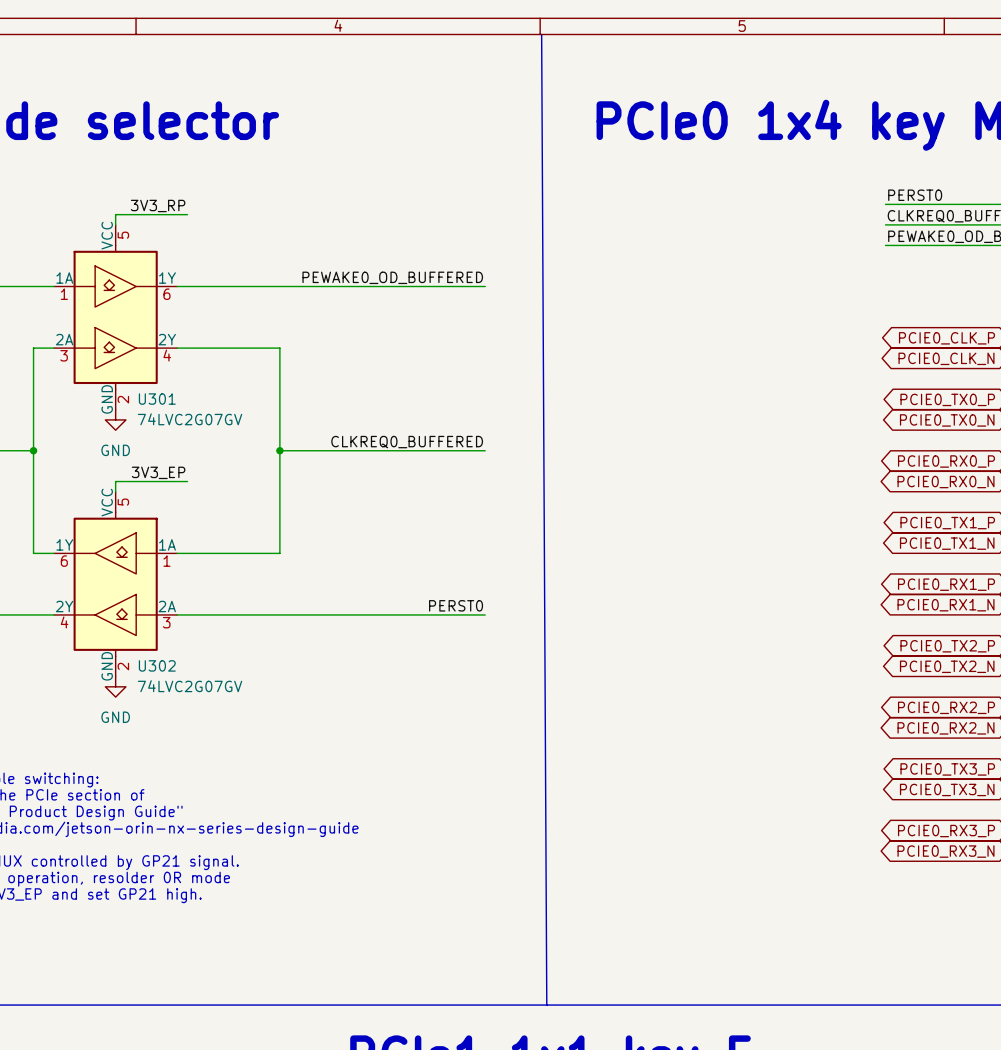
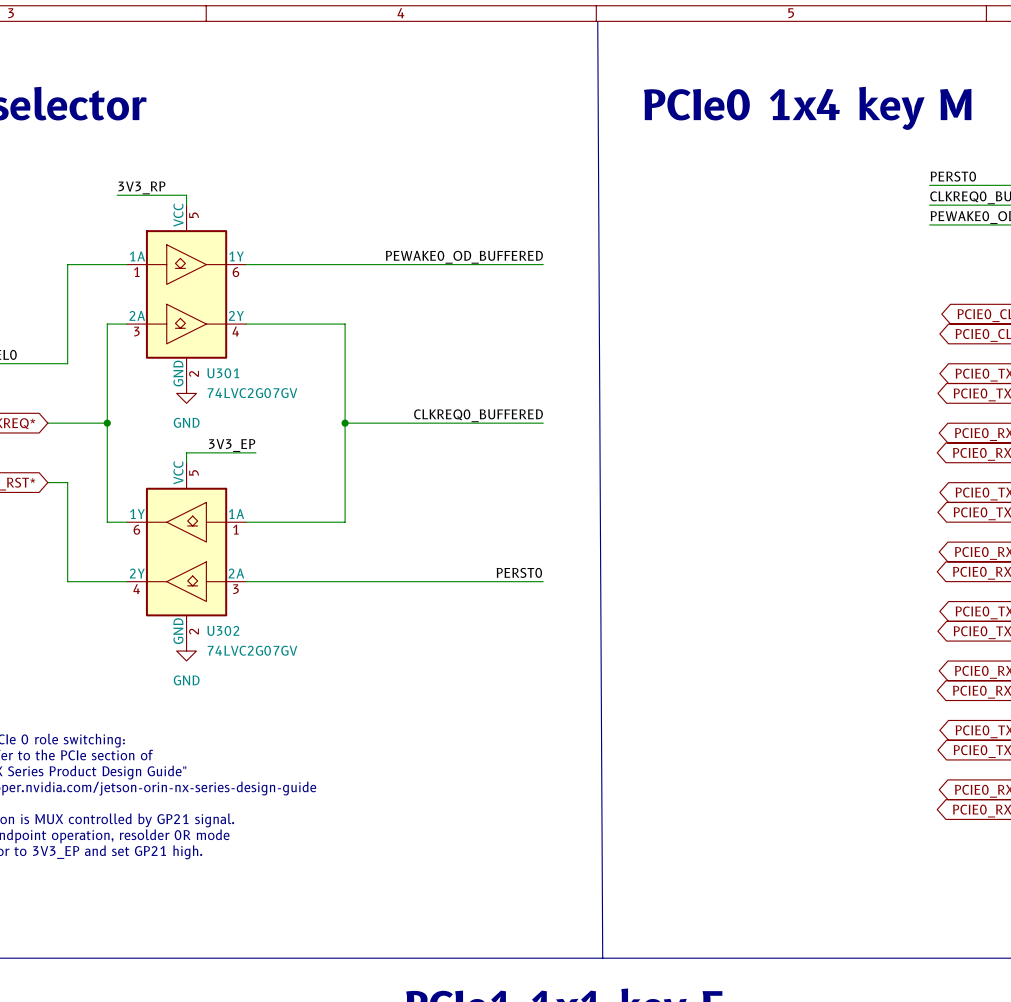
label position: 3V3_RP (158, 205) -> 3V3_RP (141, 187)
wire: (115, 214) (187, 214) -> (186, 195) (117, 195)

